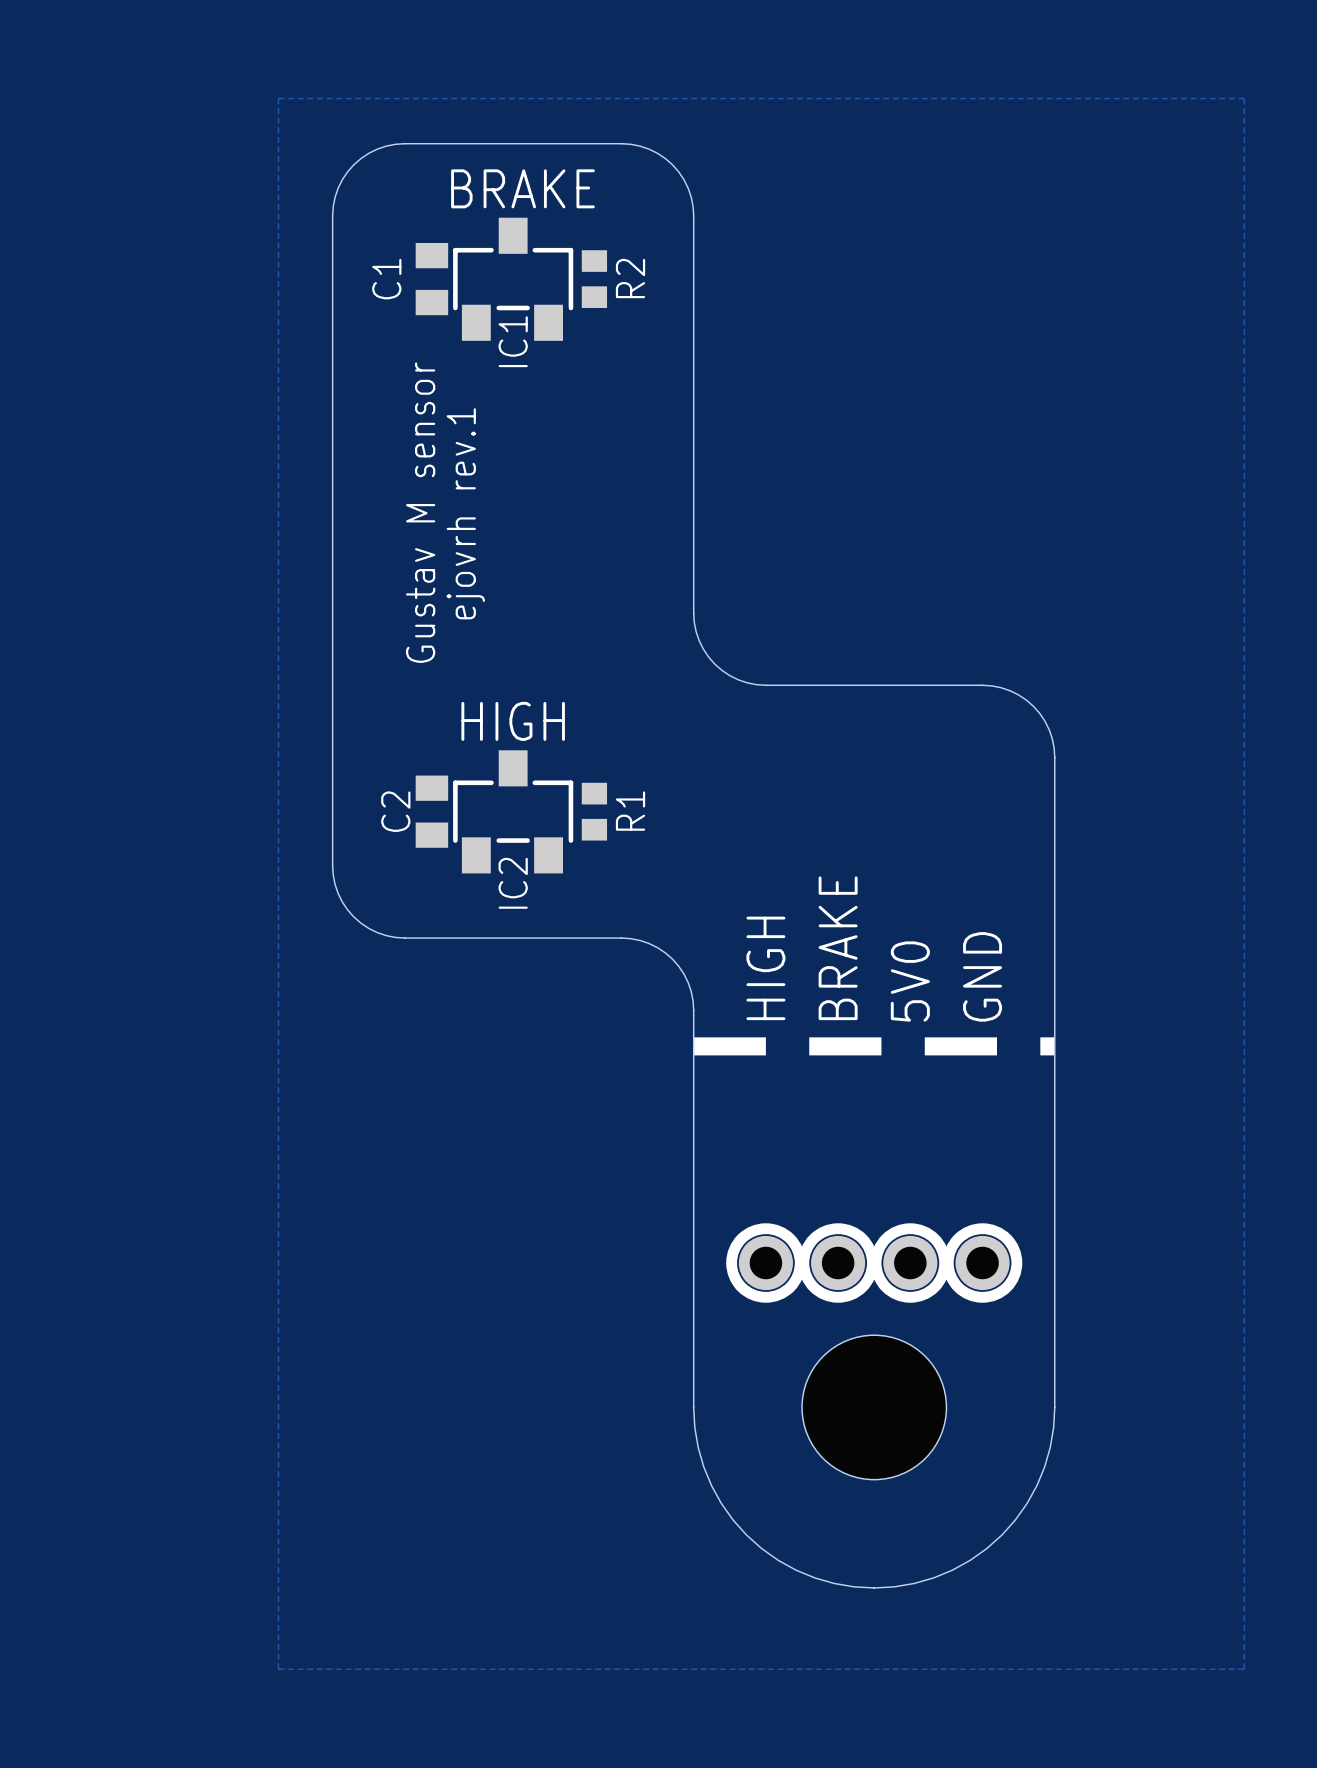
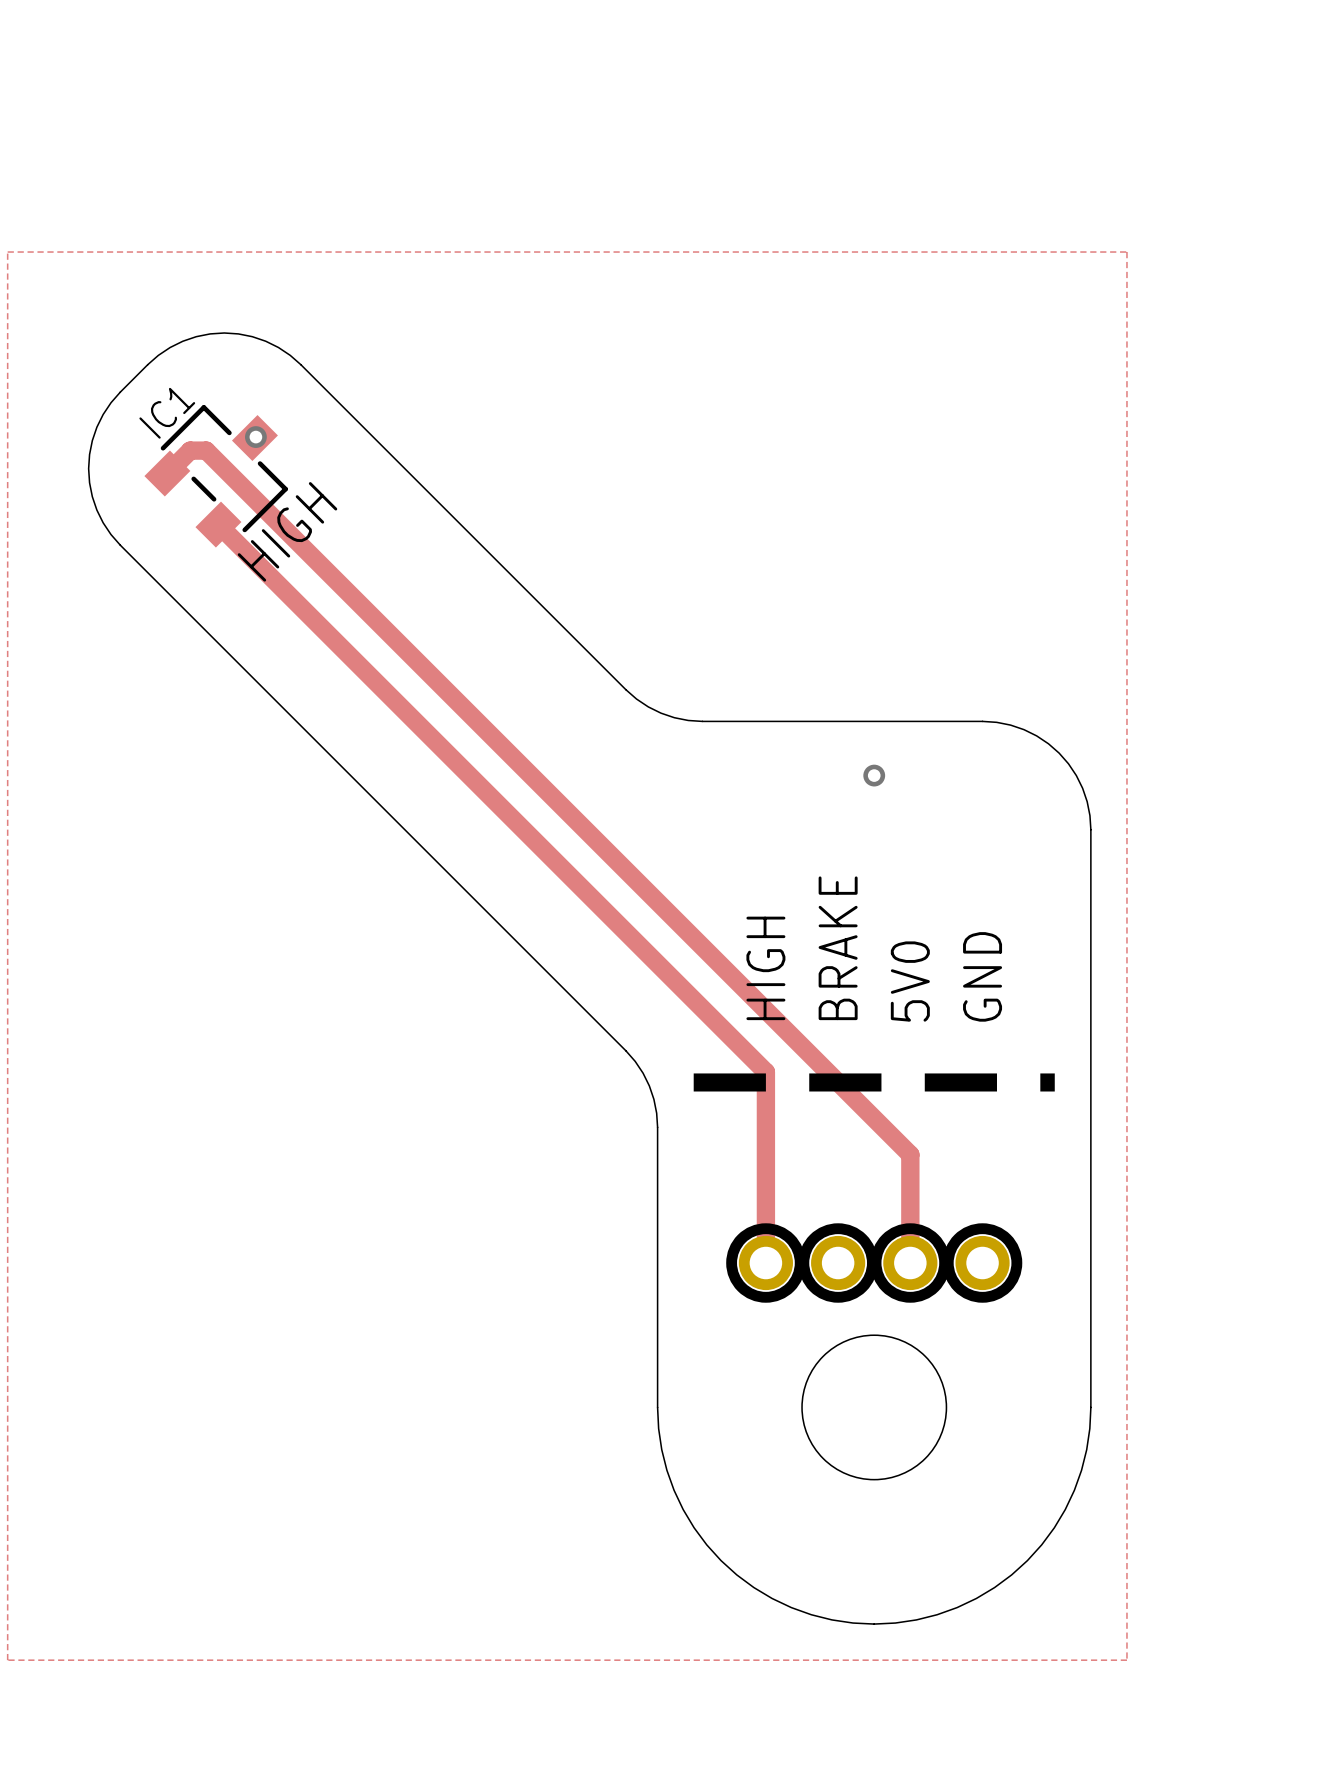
zone outline: (278, 98) (1244, 98) (1244, 1669) (278, 1669) (278, 98) -> (7, 252) (7, 1660) (1126, 1660) (1126, 252) (7, 252)
board edge: (404, 143) (630, 144) (657, 153) (672, 164) (684, 179) (691, 197) (693, 215) (693, 613) (699, 640) (714, 664) (729, 675) (756, 684) (991, 685) (1010, 690) (1026, 700) (1039, 713) (1049, 729) (1054, 757) (1053, 1427) (1044, 1467) (1027, 1503) (1015, 1519) (986, 1548) (970, 1560) (933, 1577) (894, 1586) (874, 1587) (854, 1586) (814, 1577) (778, 1560) (761, 1548) (733, 1519) (711, 1485) (703, 1467) (694, 1427) (693, 1010) (688, 982) (678, 966) (657, 947) (630, 938) (404, 938) (386, 935) (360, 923) (347, 909) (338, 893) (332, 865) (333, 206) (342, 179) (360, 158) (377, 149) (404, 143) -> (147, 364) (111, 402) (96, 427) (92, 440) (88, 468) (89, 482) (96, 510) (111, 534) (625, 1050) (643, 1073) (649, 1085) (653, 1099) (657, 1127) (658, 1428) (661, 1449) (674, 1490) (694, 1527) (721, 1560) (753, 1587) (791, 1607) (831, 1619) (874, 1624) (916, 1619) (957, 1607) (994, 1587) (1011, 1574) (1041, 1544) (1065, 1509) (1081, 1470) (1089, 1428) (1090, 829) (1087, 801) (1076, 775) (1068, 763) (1048, 743) (1036, 735) (1010, 725) (996, 722) (702, 721) (674, 717) (661, 713) (648, 706) (625, 689) (290, 355) (265, 341) (238, 333) (224, 332) (210, 333) (182, 341) (158, 355) (147, 364)
text: BRAKE (522, 188) -> none
C1: (431, 279) -> none
IC1 rotation: 0° (513, 279) -> 45° clockwise (216, 476)
IC1 position: (513, 279) -> (216, 476)
R2: (594, 279) -> none
IC1 name position: IC1 (513, 341) -> IC1 (167, 413)
via: none -> (255, 437)
track: none -> (167, 473) (190, 450) (206, 450) (910, 1154) (910, 1263)
text: Gustav M sensor (420, 512) -> none
text: ejovrh rev.1 (465, 513) -> none
track: none -> (218, 524) (765, 1072) (765, 1263)
text rotation: 0° (513, 721) -> 45° counterclockwise (287, 531)
text position: HIGH (513, 721) -> HIGH (287, 531)
via: none -> (874, 775)
C2: (431, 811) -> none
IC2: (513, 811) -> none
R1: (594, 811) -> none
line: (693, 1046) (1054, 1046) -> (693, 1082) (1054, 1082)

